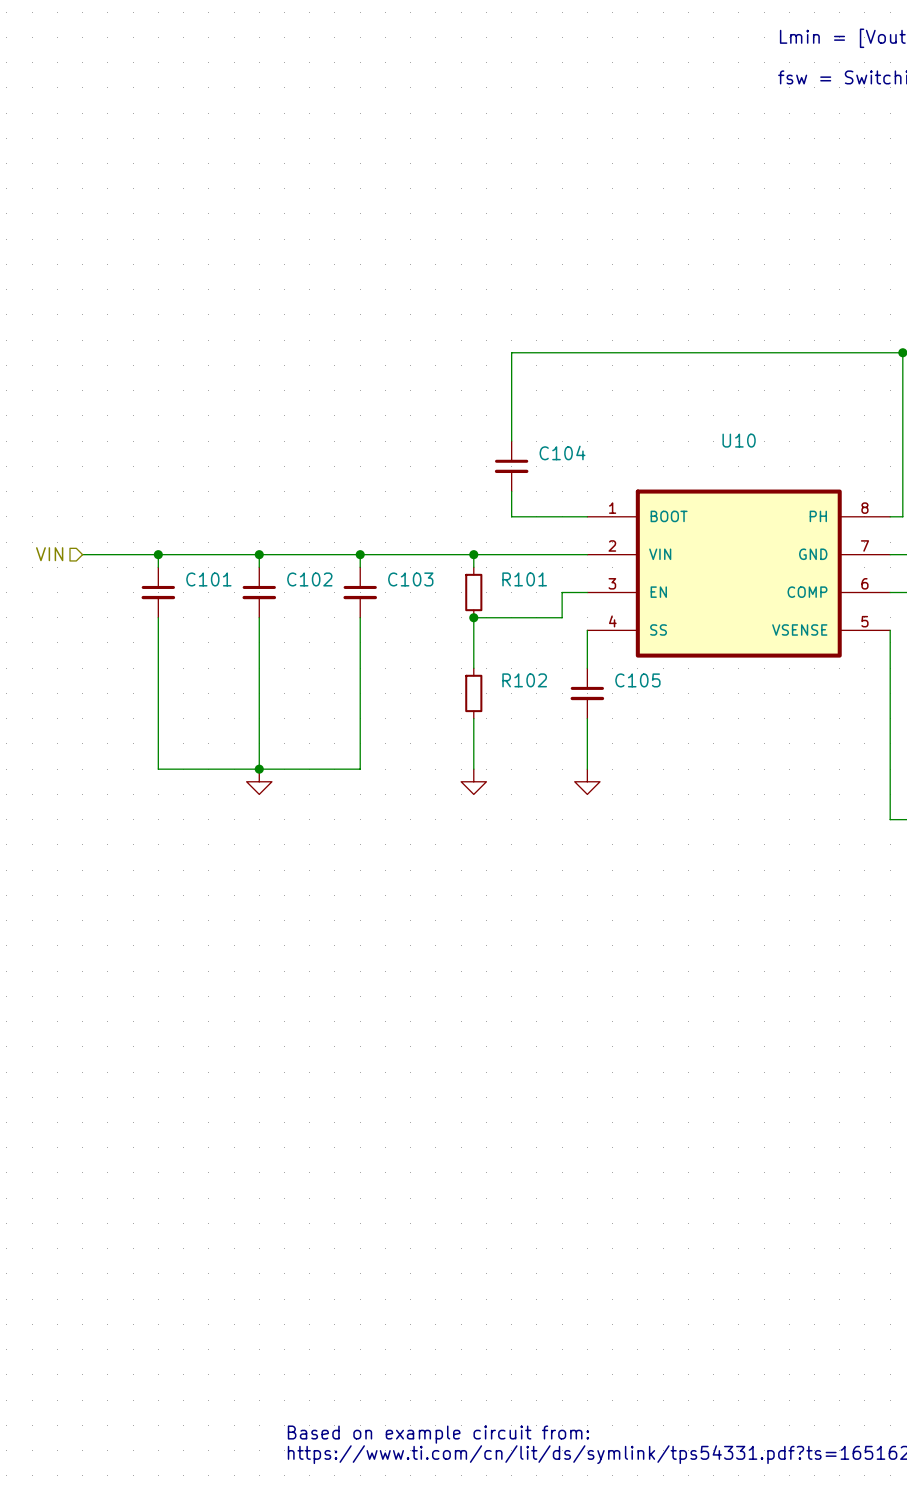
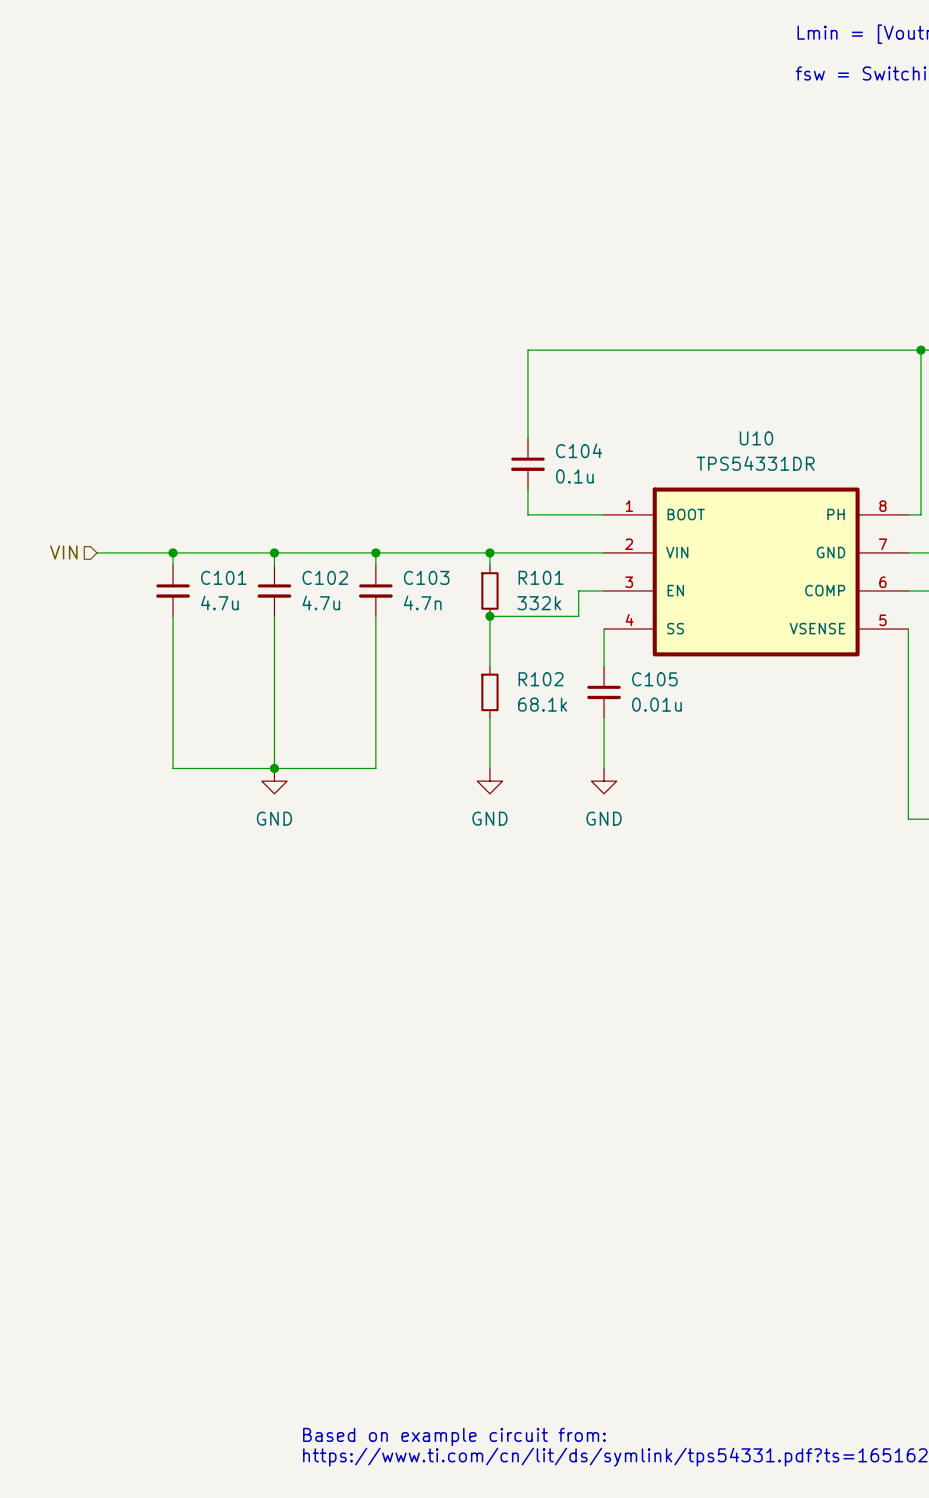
U10 value: none -> TPS54331DR (755, 463)
C104 value: none -> 0.1u (574, 476)
C101 value: none -> 4.7u (219, 602)
C102 value: none -> 4.7u (321, 602)
C103 value: none -> 4.7n (422, 602)
R101 value: none -> 332k (539, 603)
R102 value: none -> 68.1k (542, 704)
C105 value: none -> 0.01u (656, 704)
power symbol text: none -> GND (274, 818)
power symbol text: none -> GND (489, 818)
power symbol text: none -> GND (604, 818)

